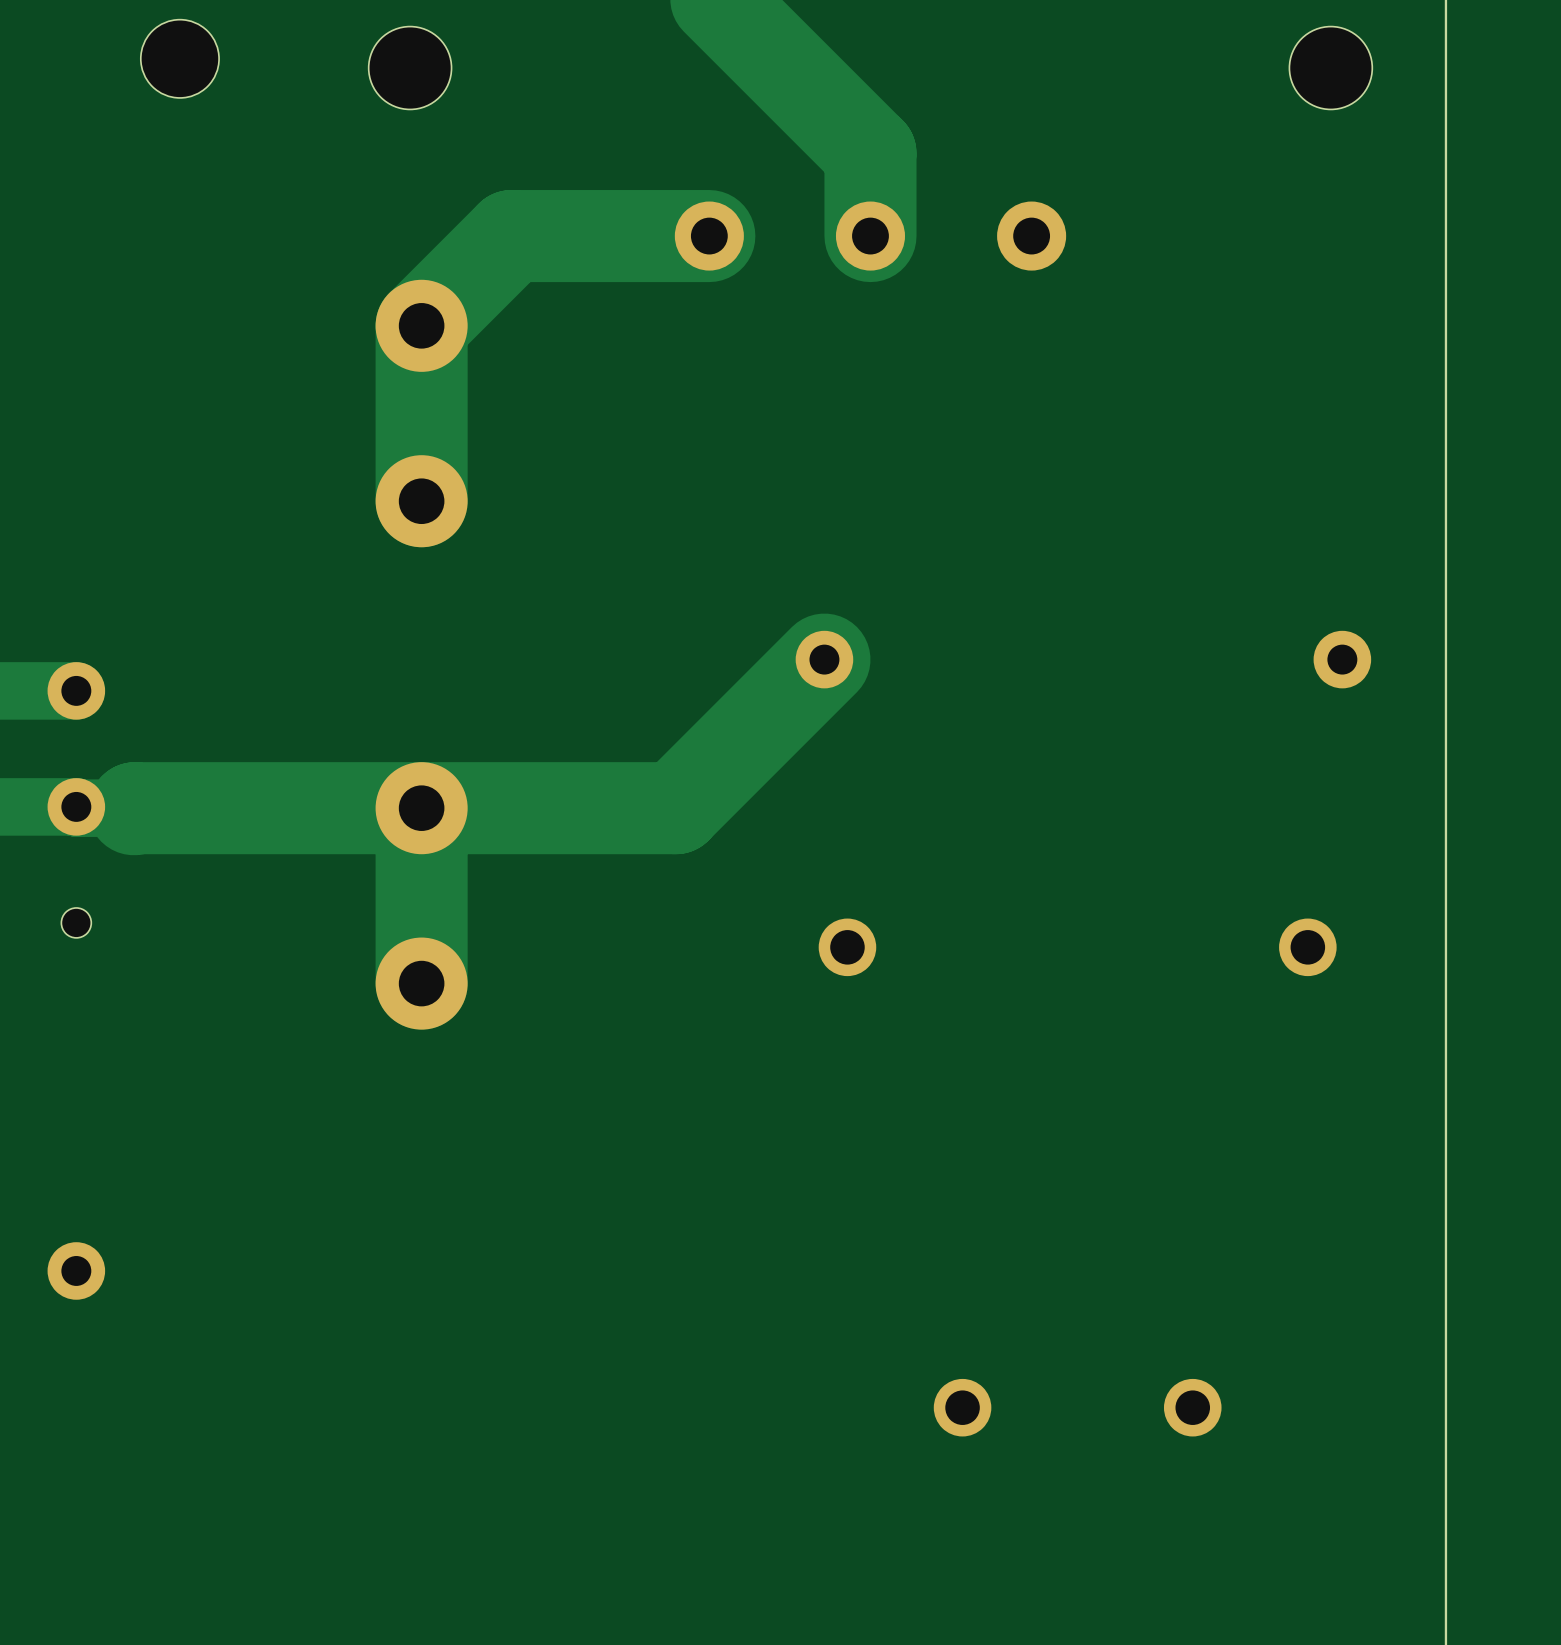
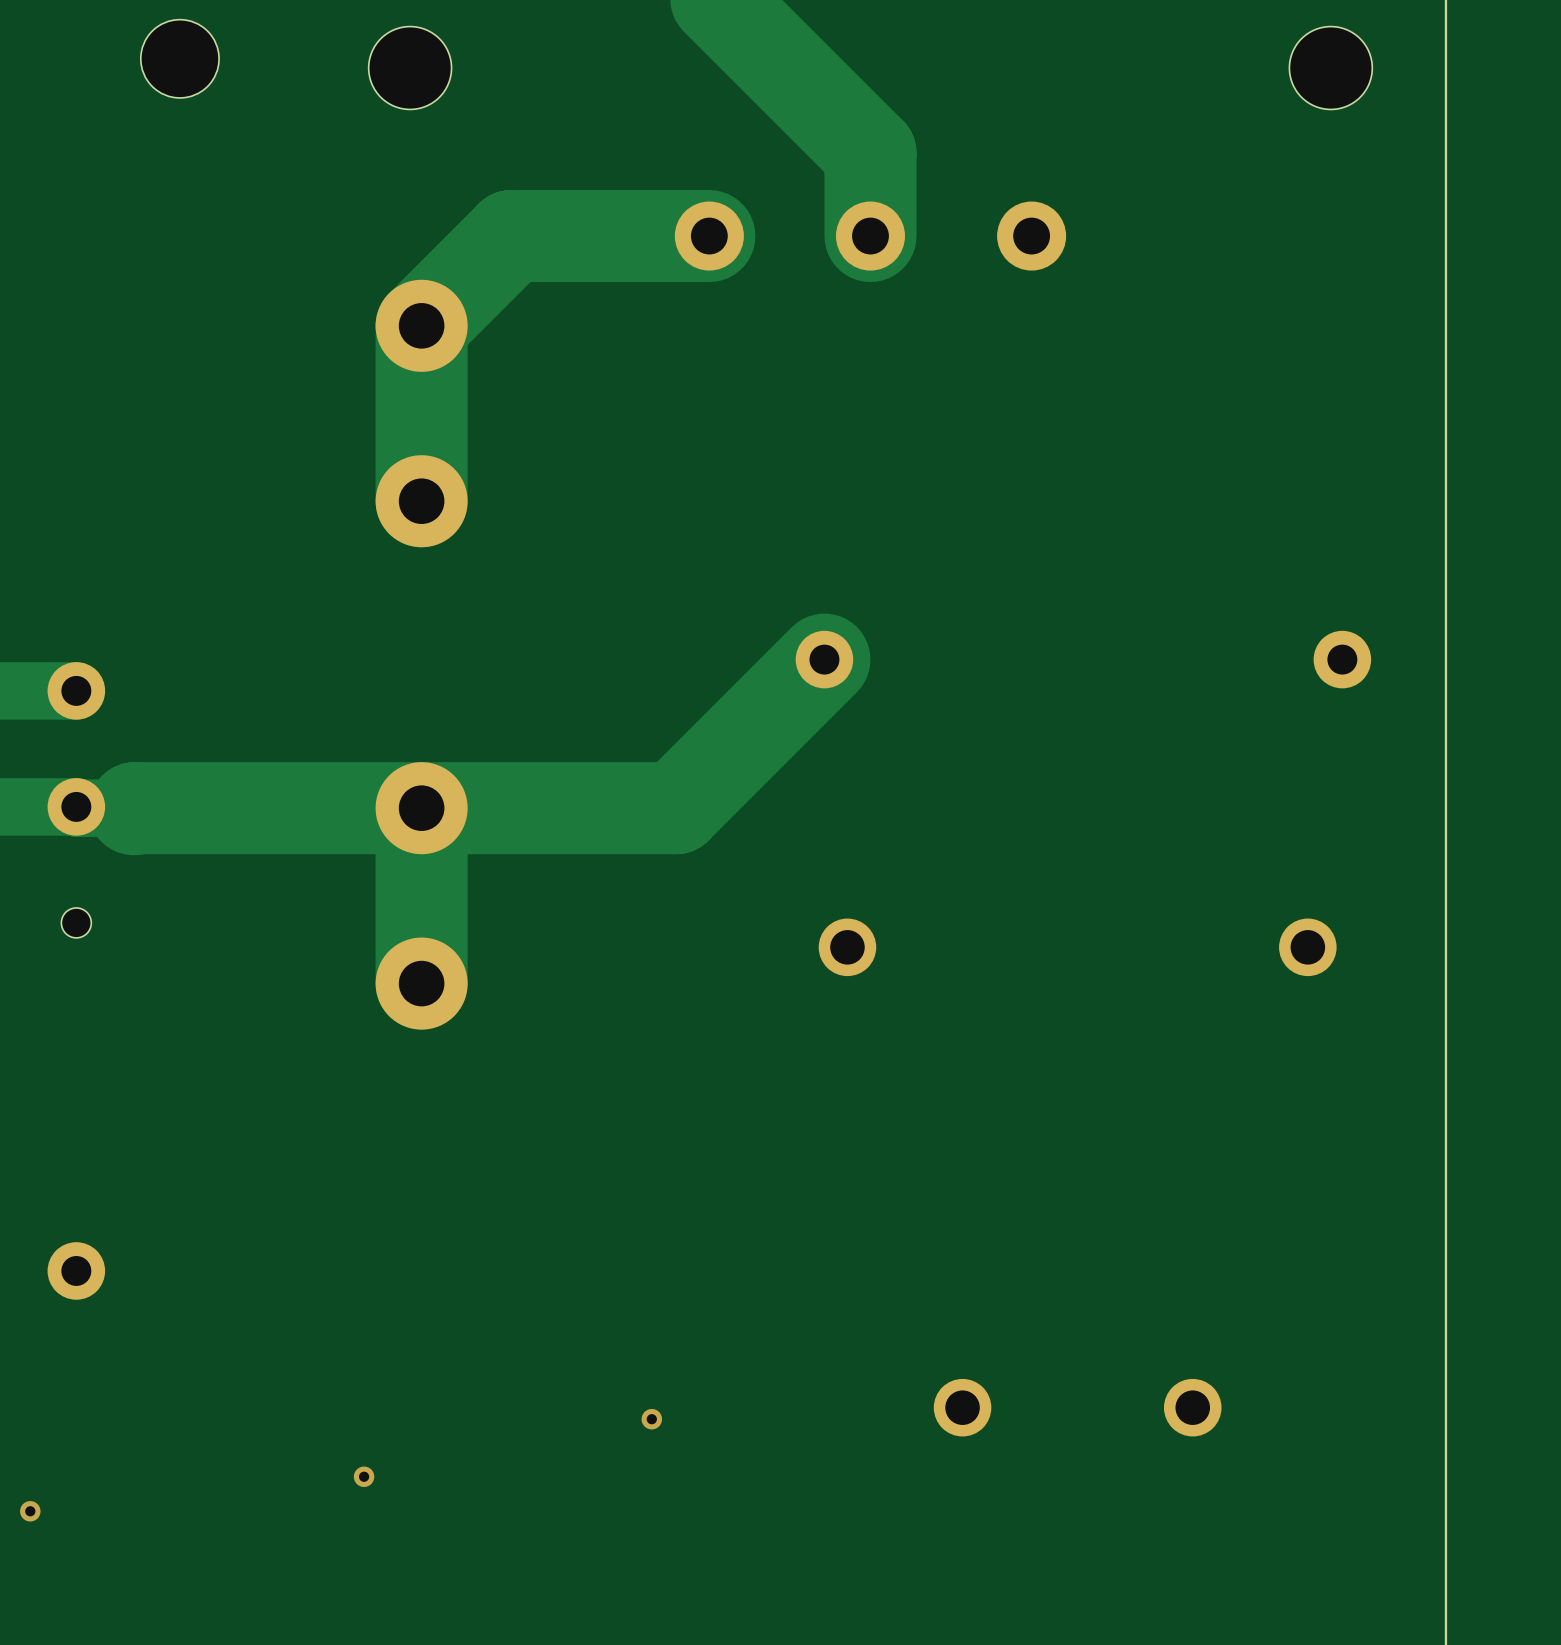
via: none -> (651, 1419)
via: none -> (364, 1476)
via: none -> (30, 1511)

